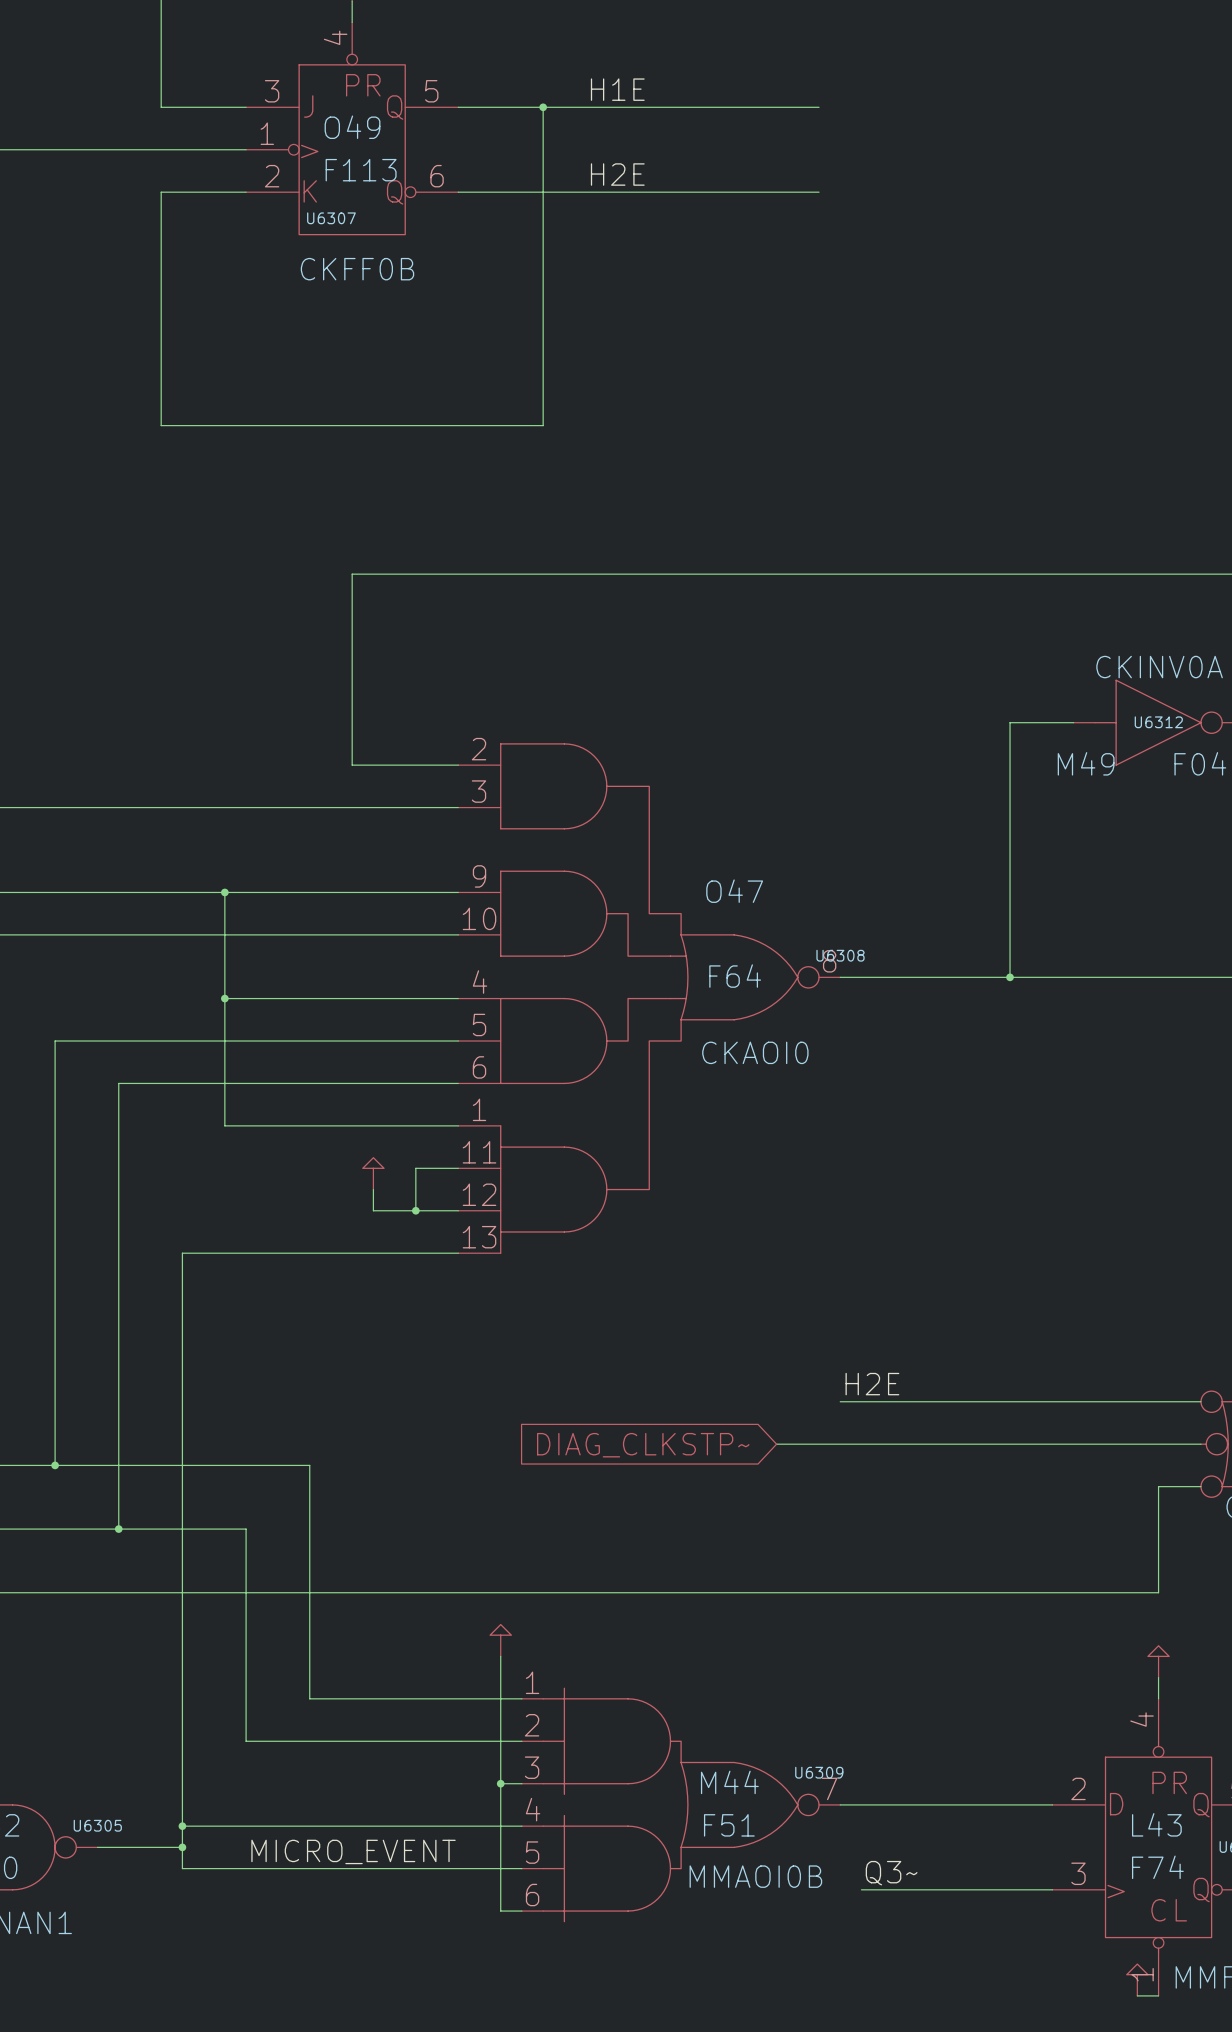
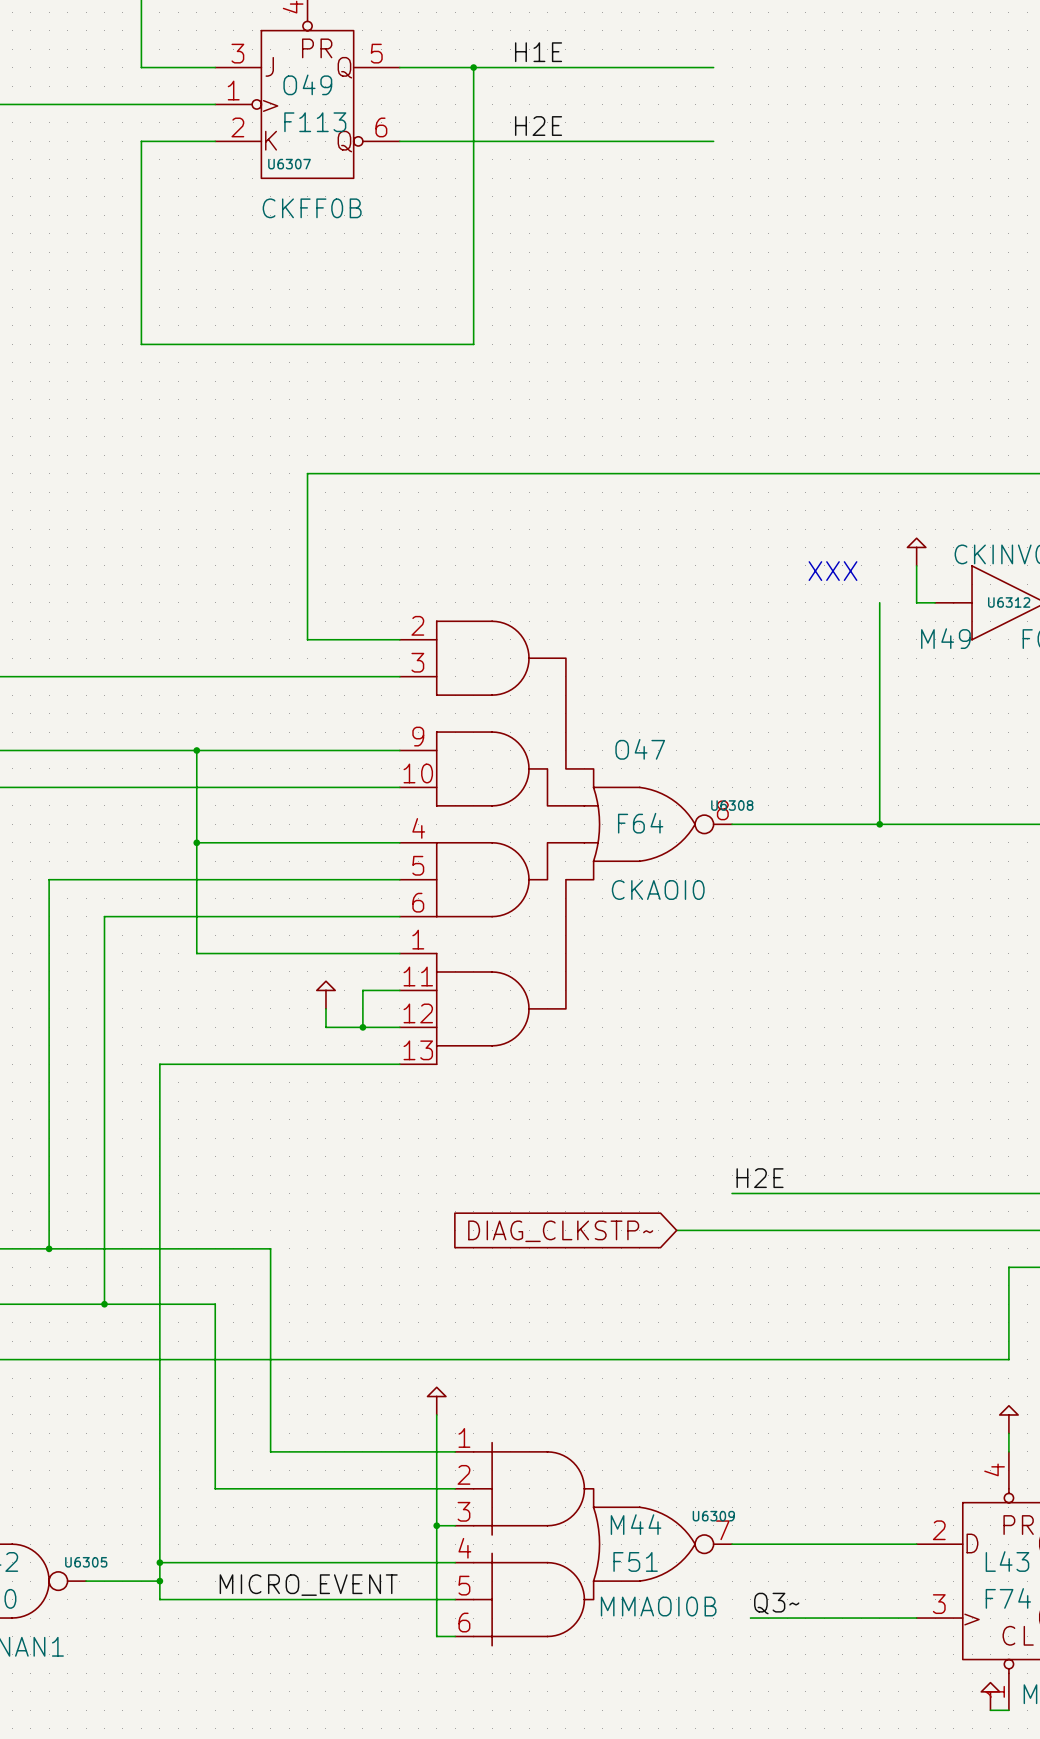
power symbol: none -> (916, 551)
text: none -> XXX (832, 571)
wire: (1010, 722) (1052, 722) -> (916, 565) (916, 602)

